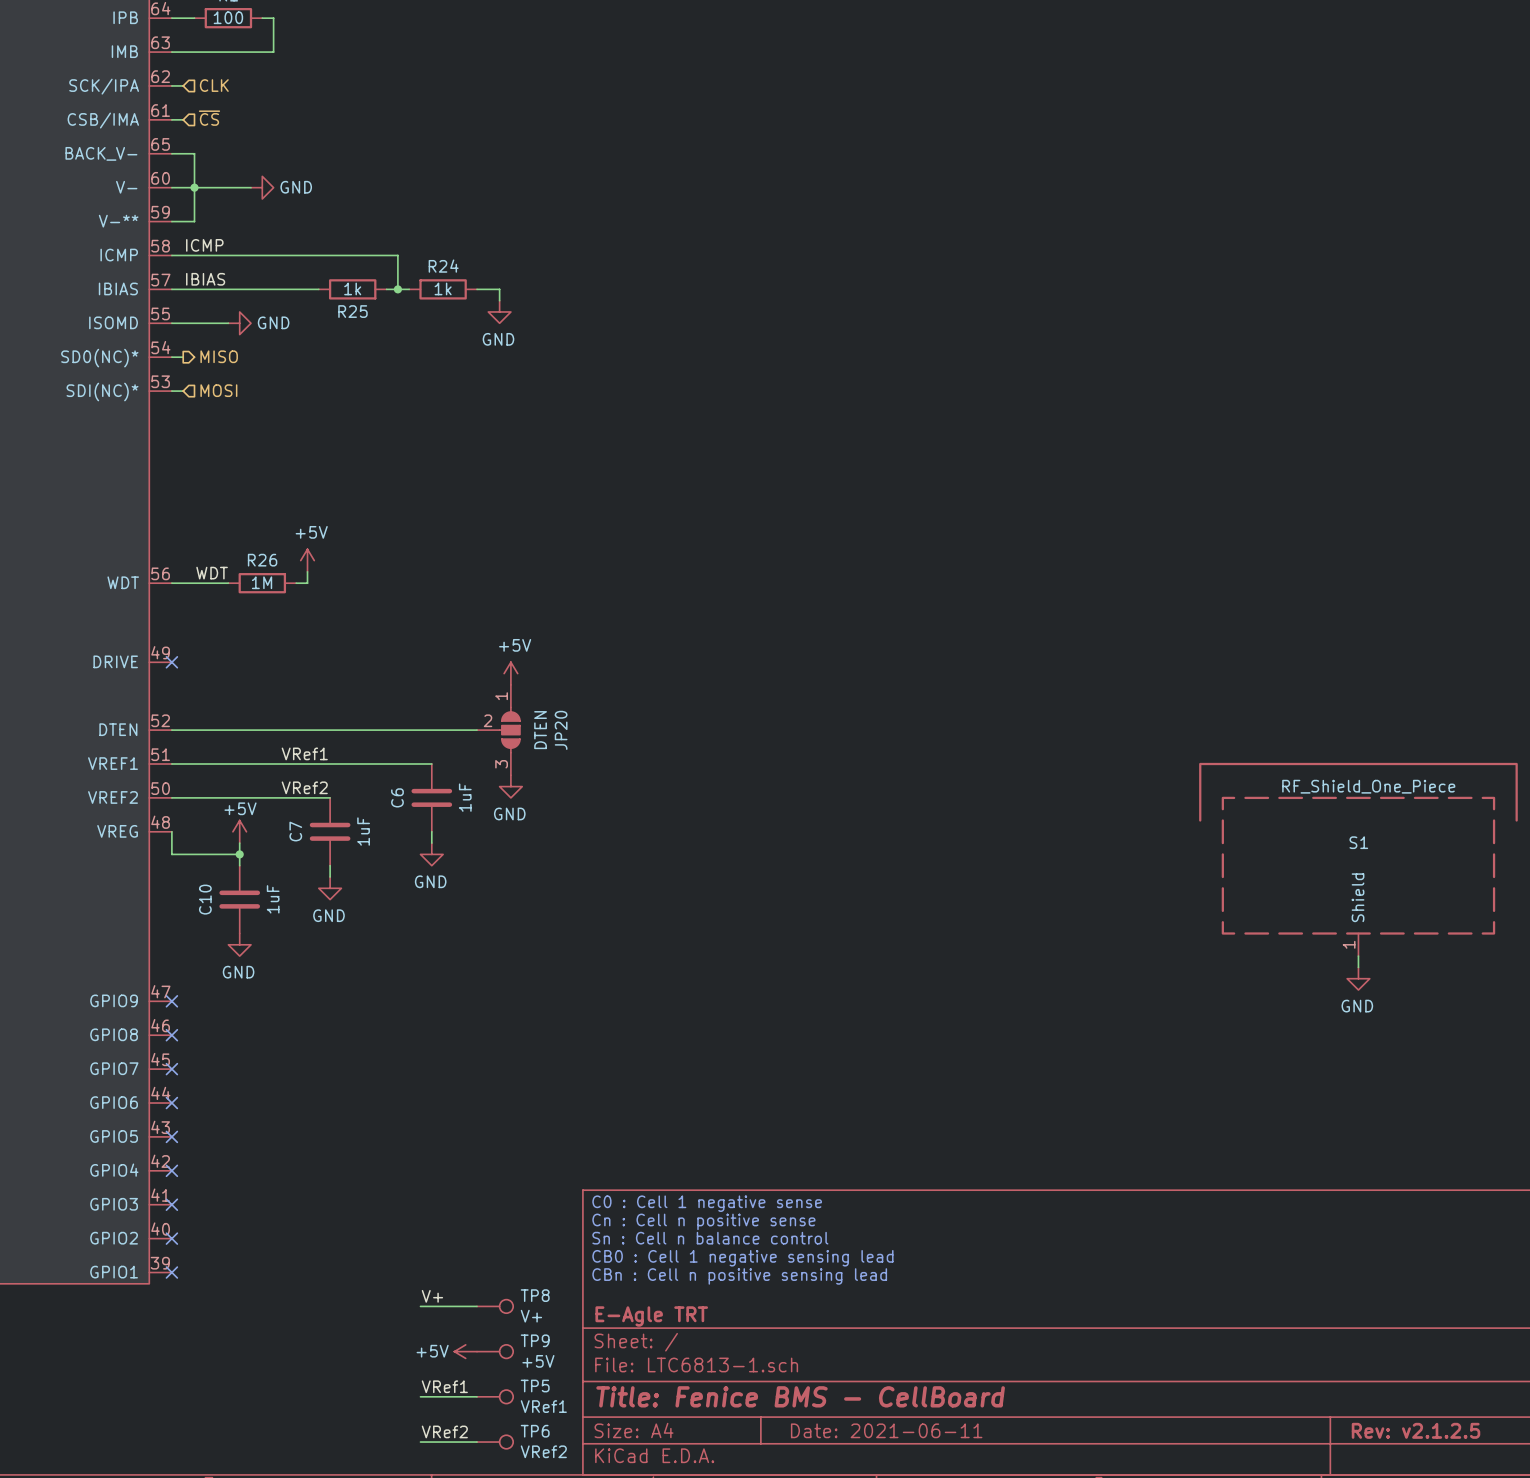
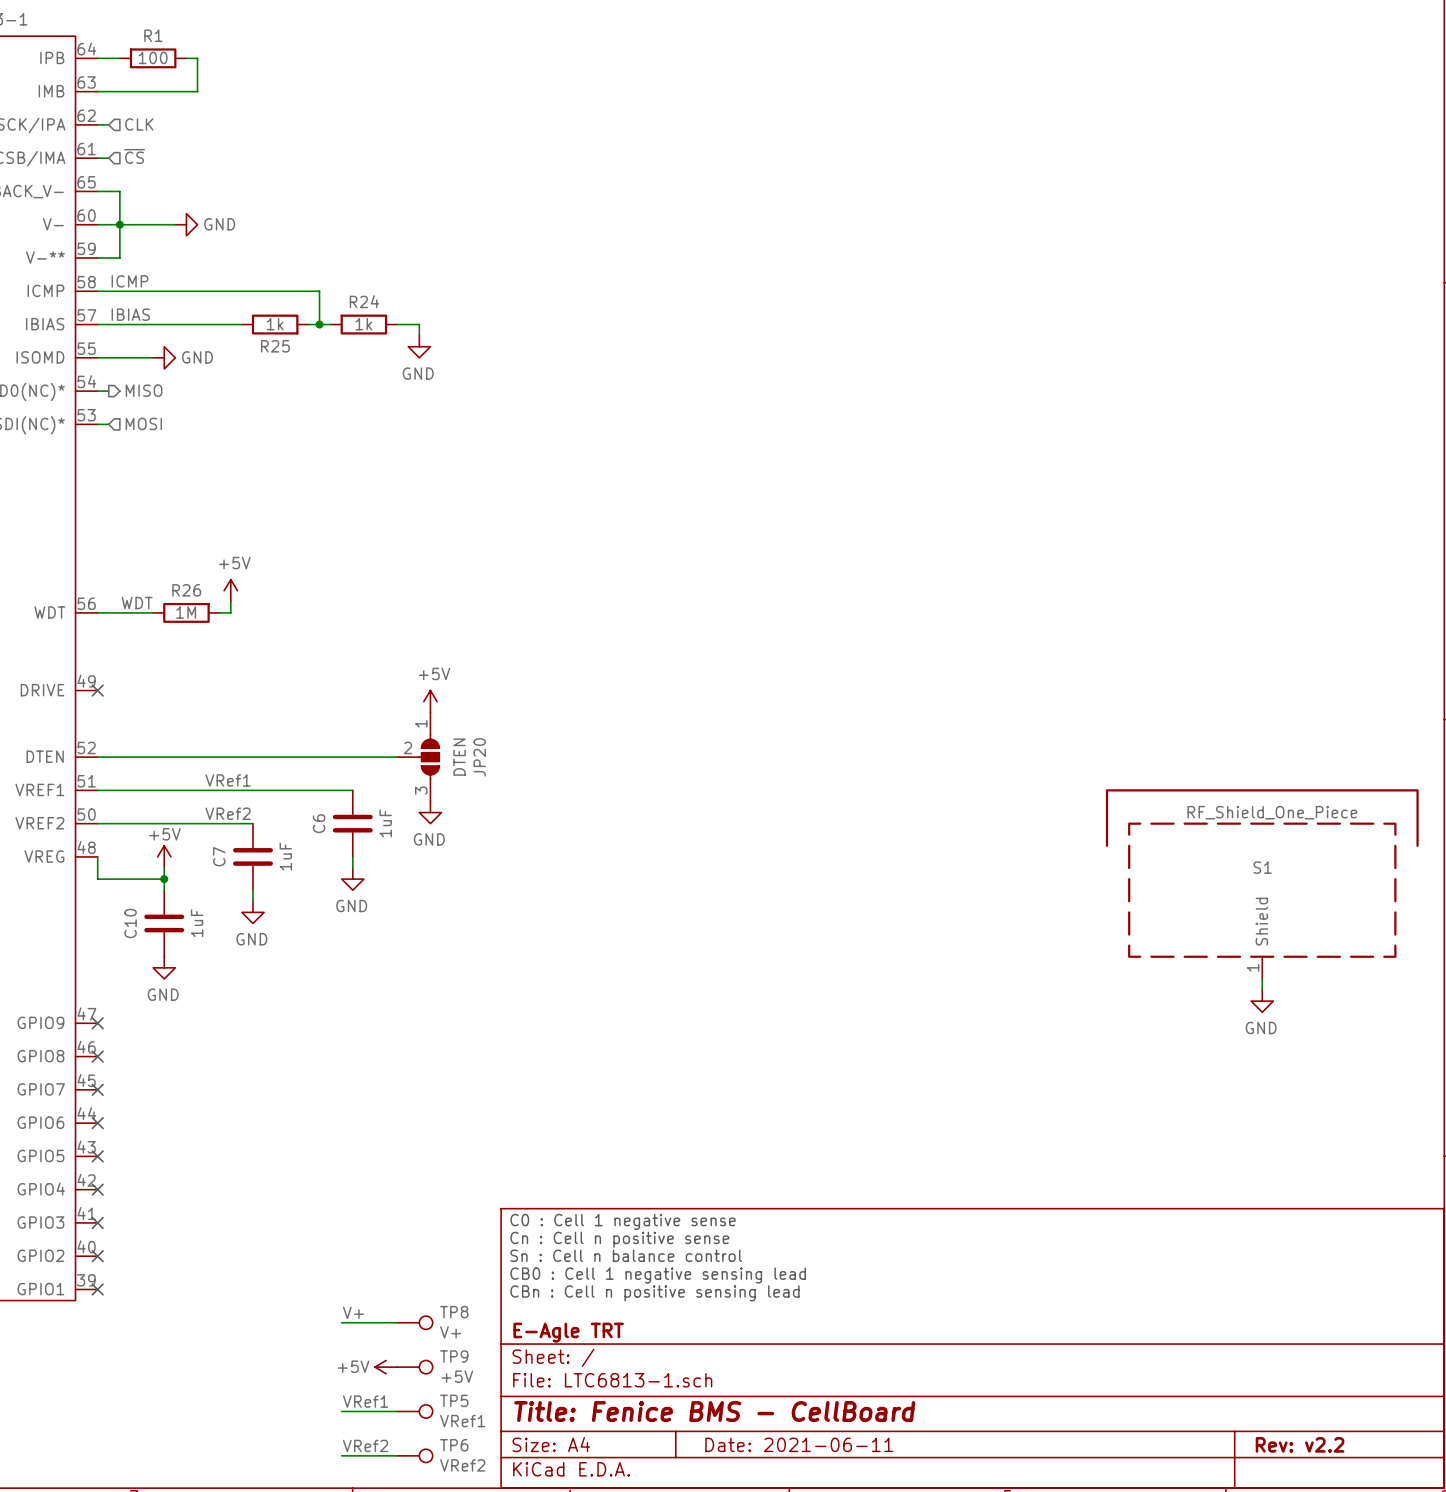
title block: Rev: v2.1.2.5 (1416, 1430) -> Rev: v2.2 (1300, 1444)

